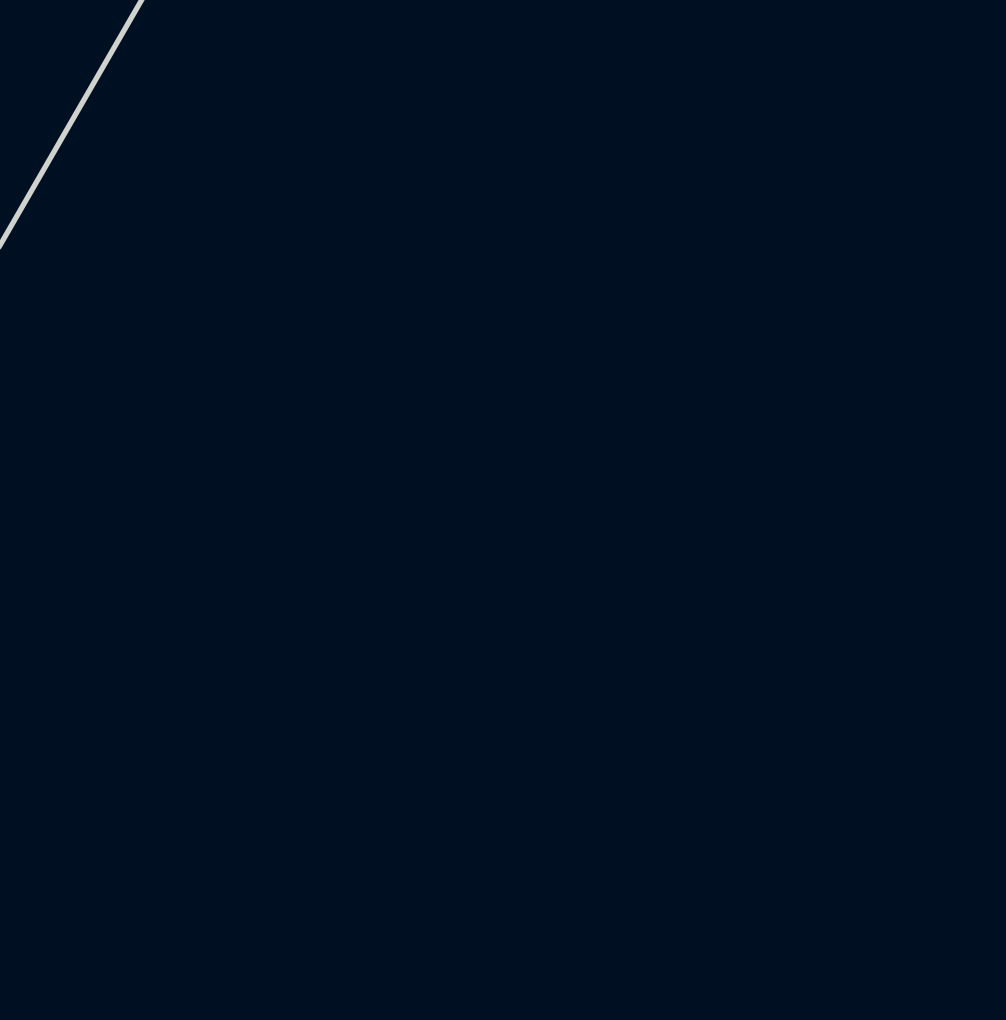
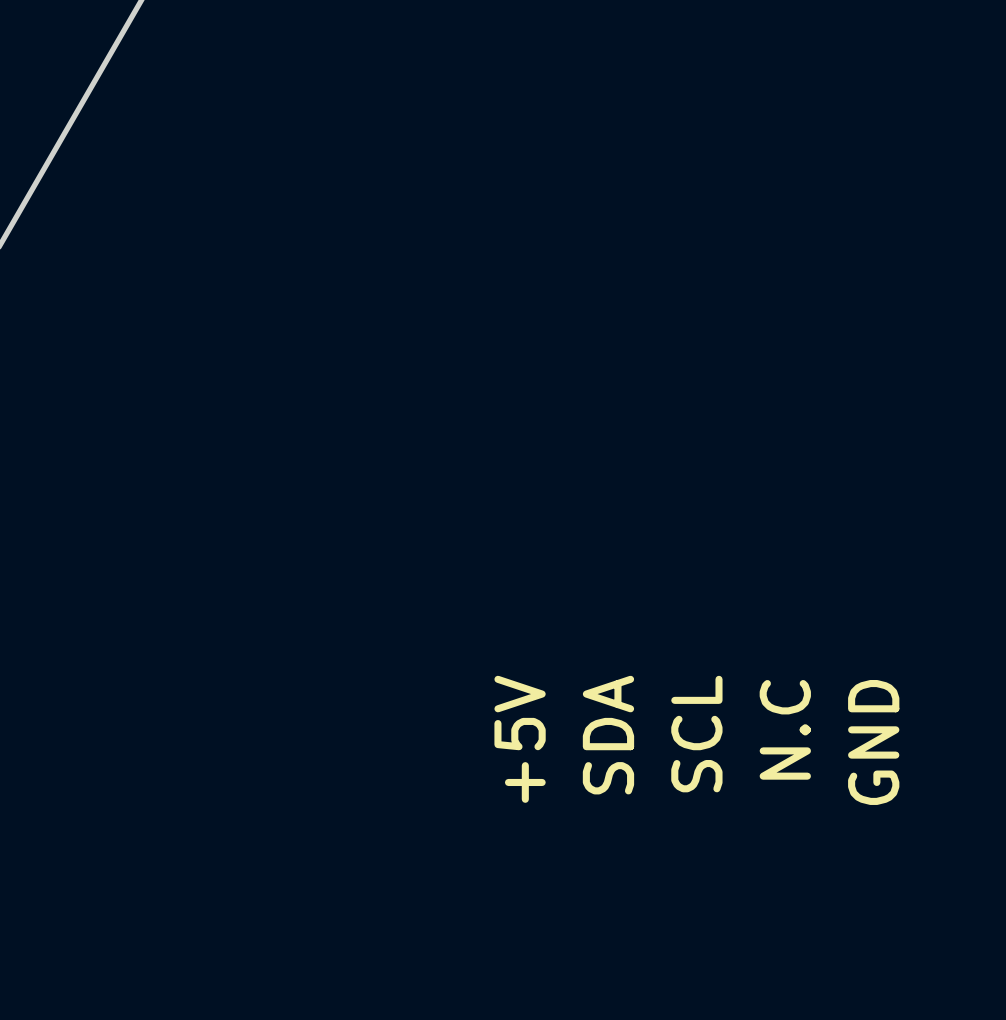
text: none -> N.C (785, 729)
text: none -> SCL (696, 734)
text: none -> SDA (608, 735)
text: none -> +5V (520, 739)
text: none -> GND (873, 742)

